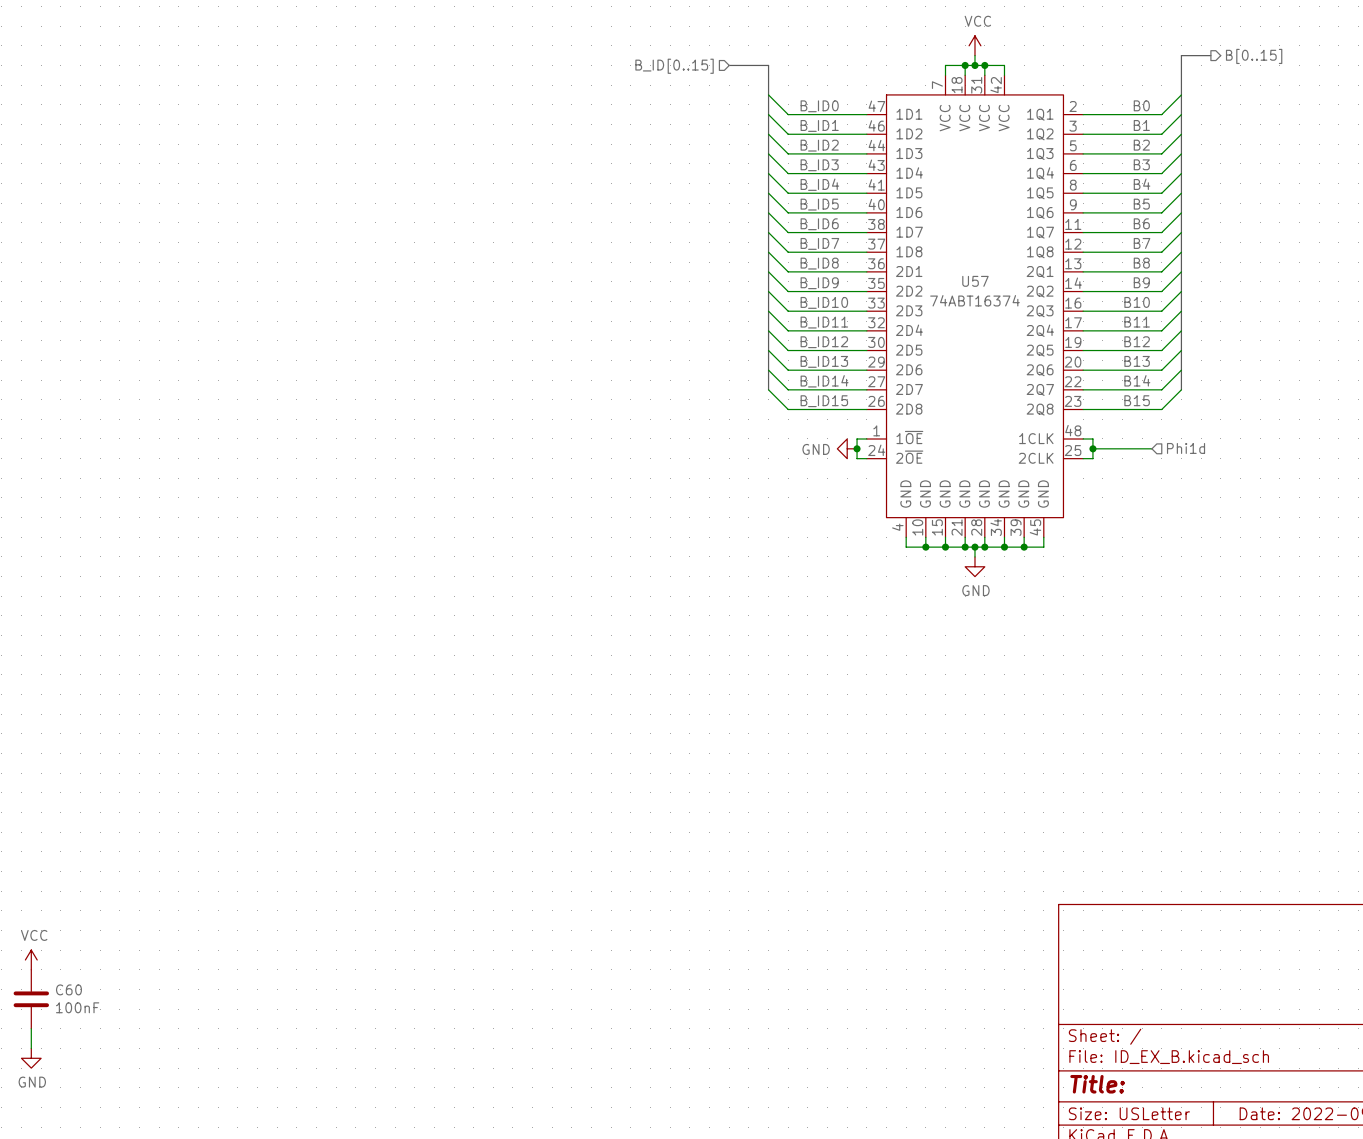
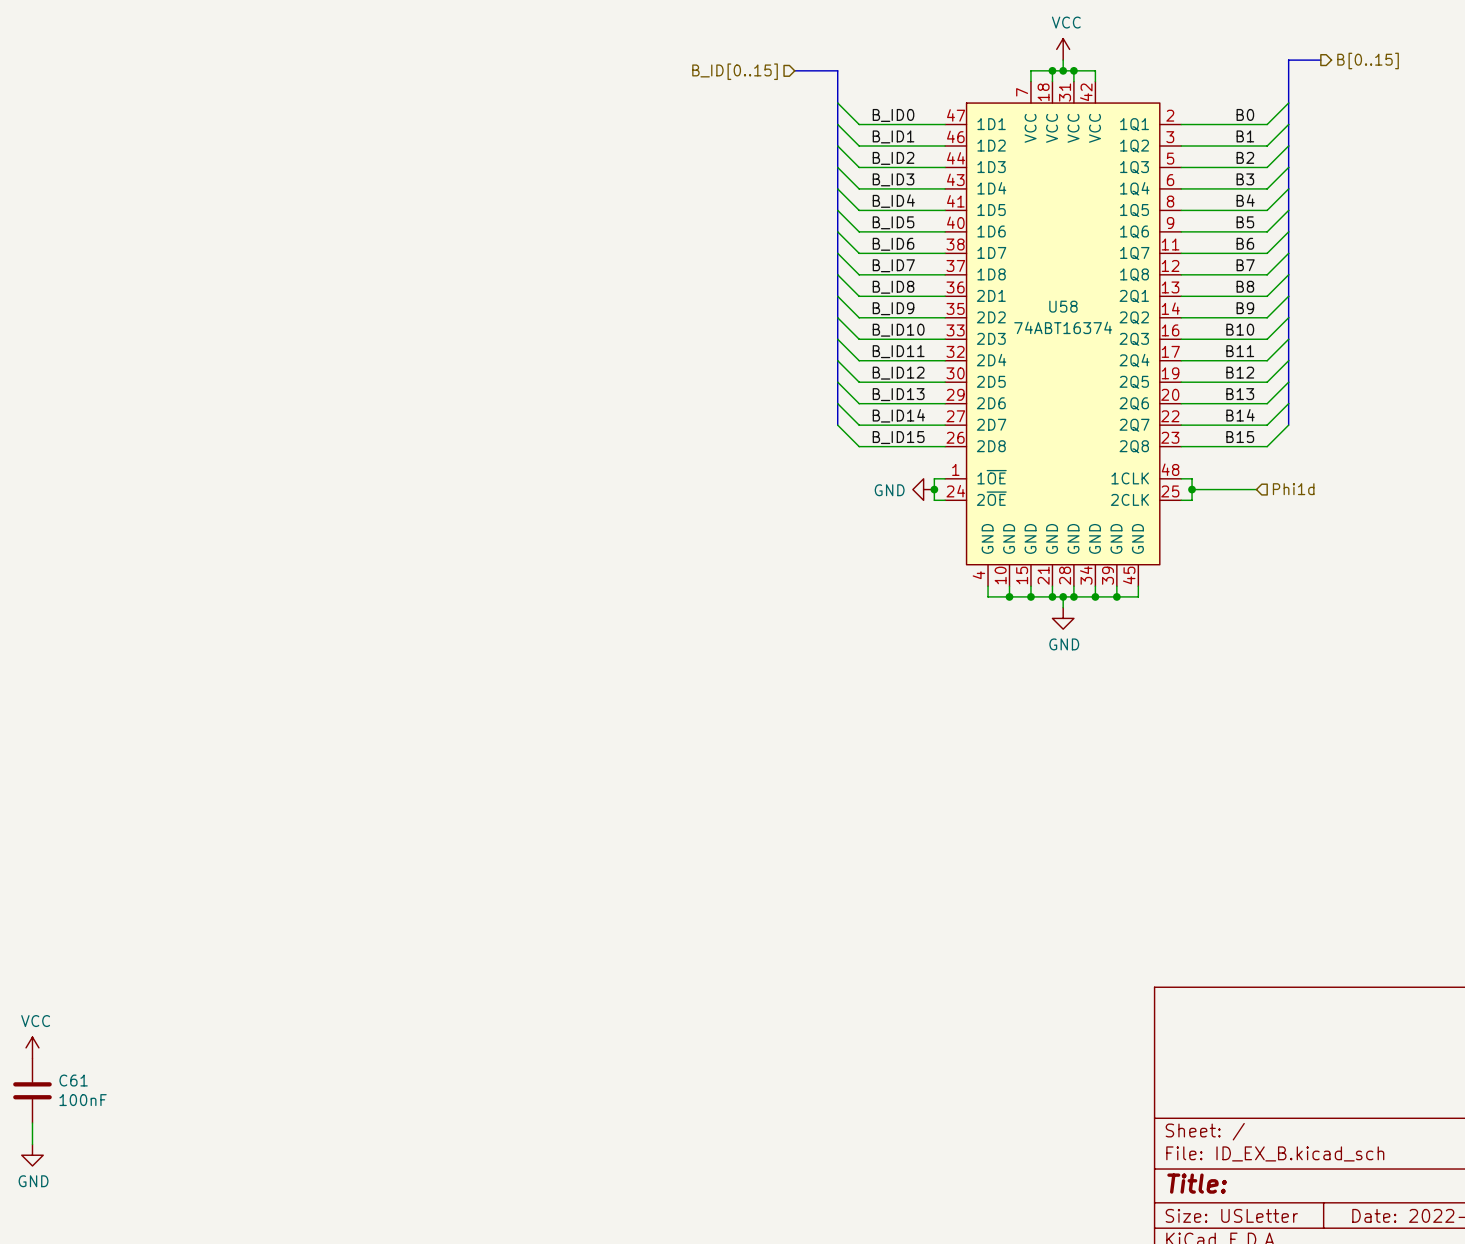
U57 name: U57 (975, 281) -> U58 (1063, 306)
C60 name: C60 (68, 989) -> C61 (73, 1080)

